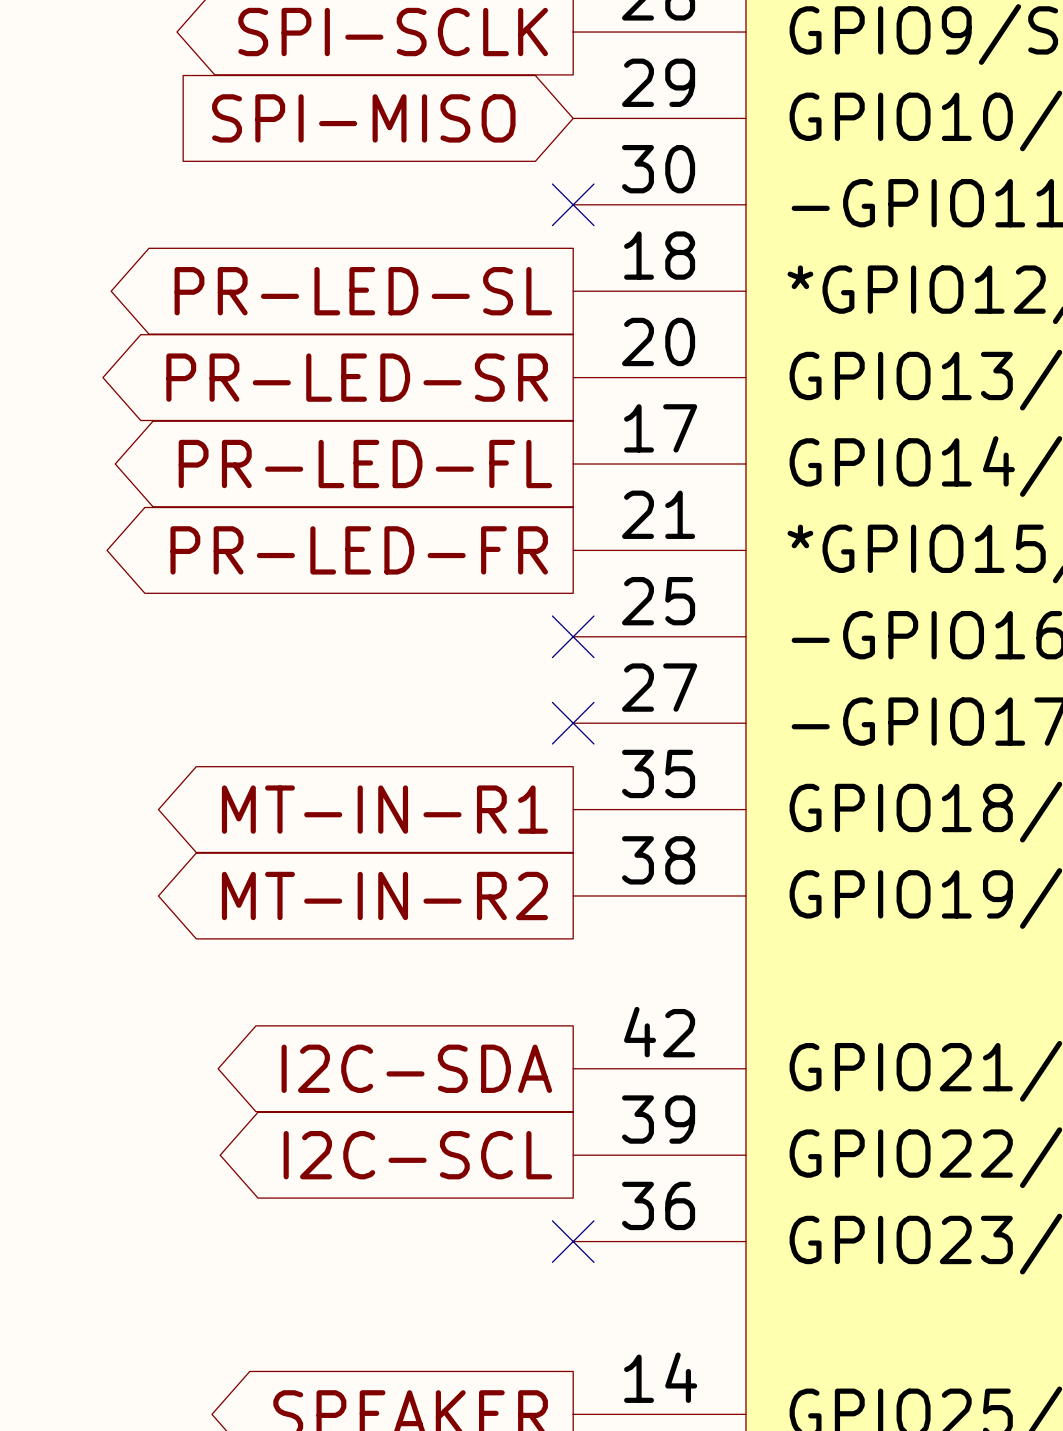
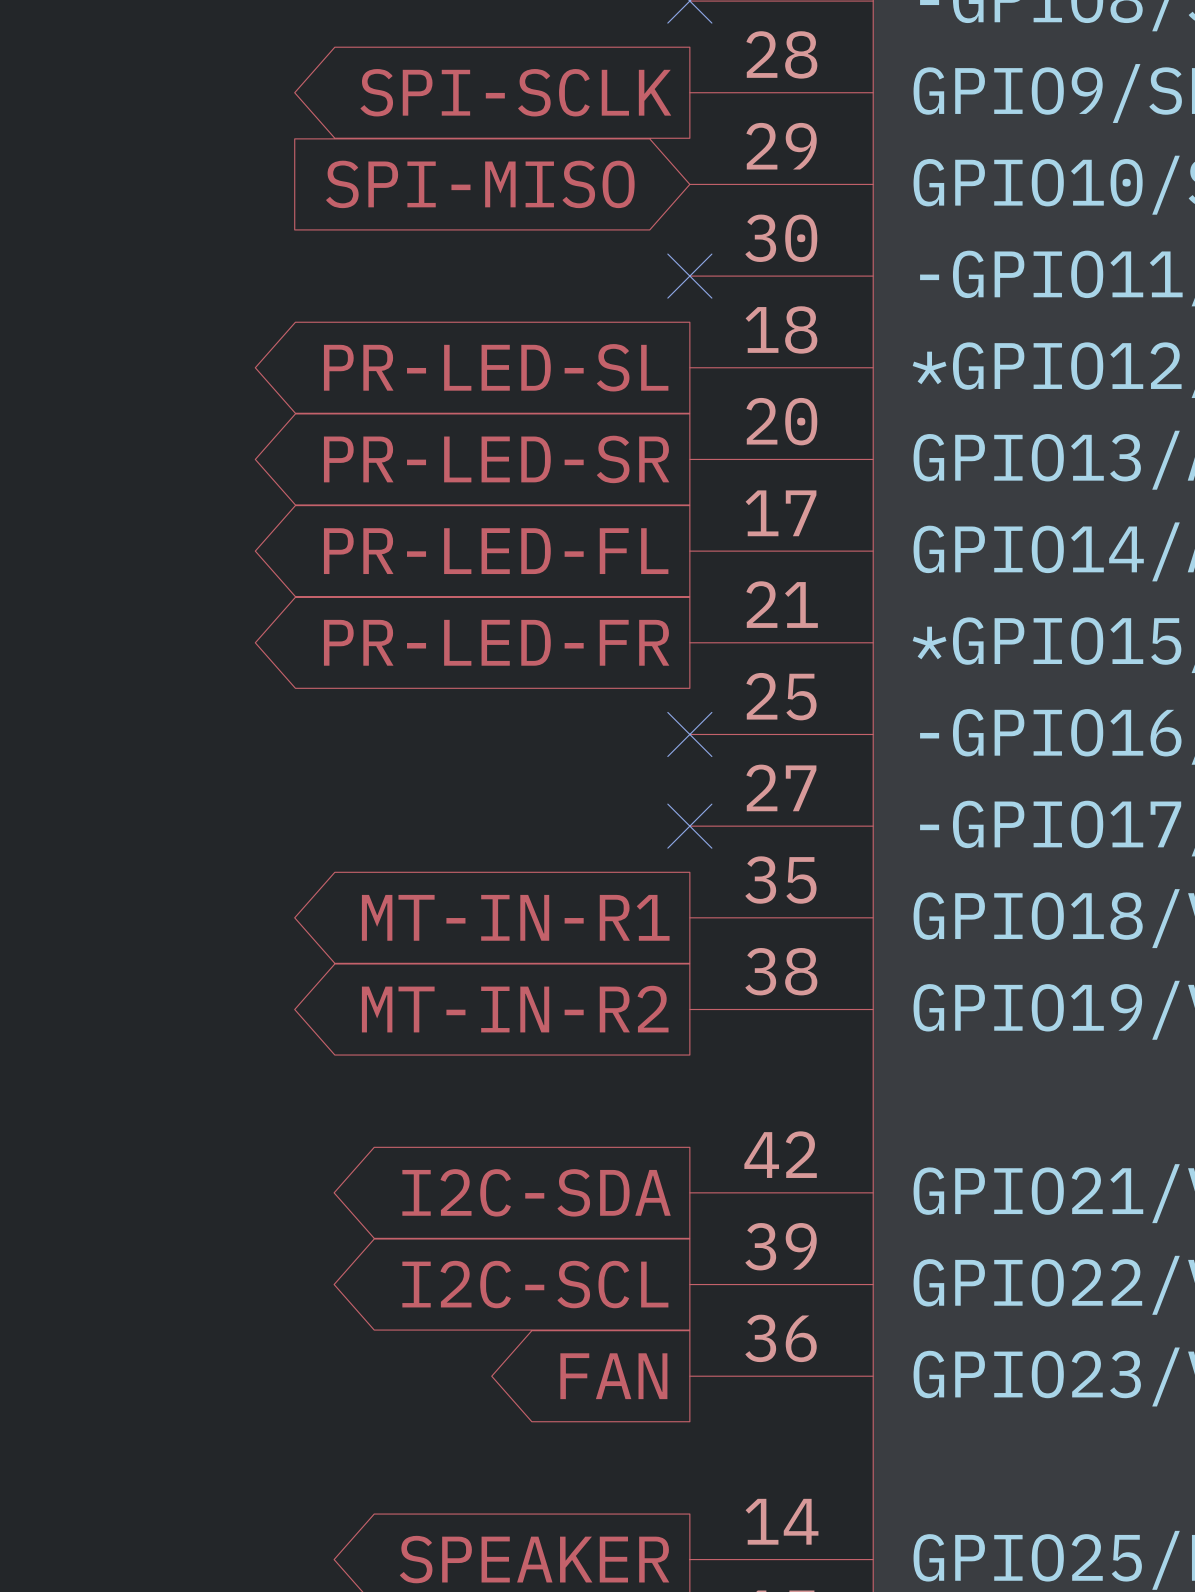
global label: none -> FAN (613, 1376)
no-connect mark: (573, 1241) -> none

